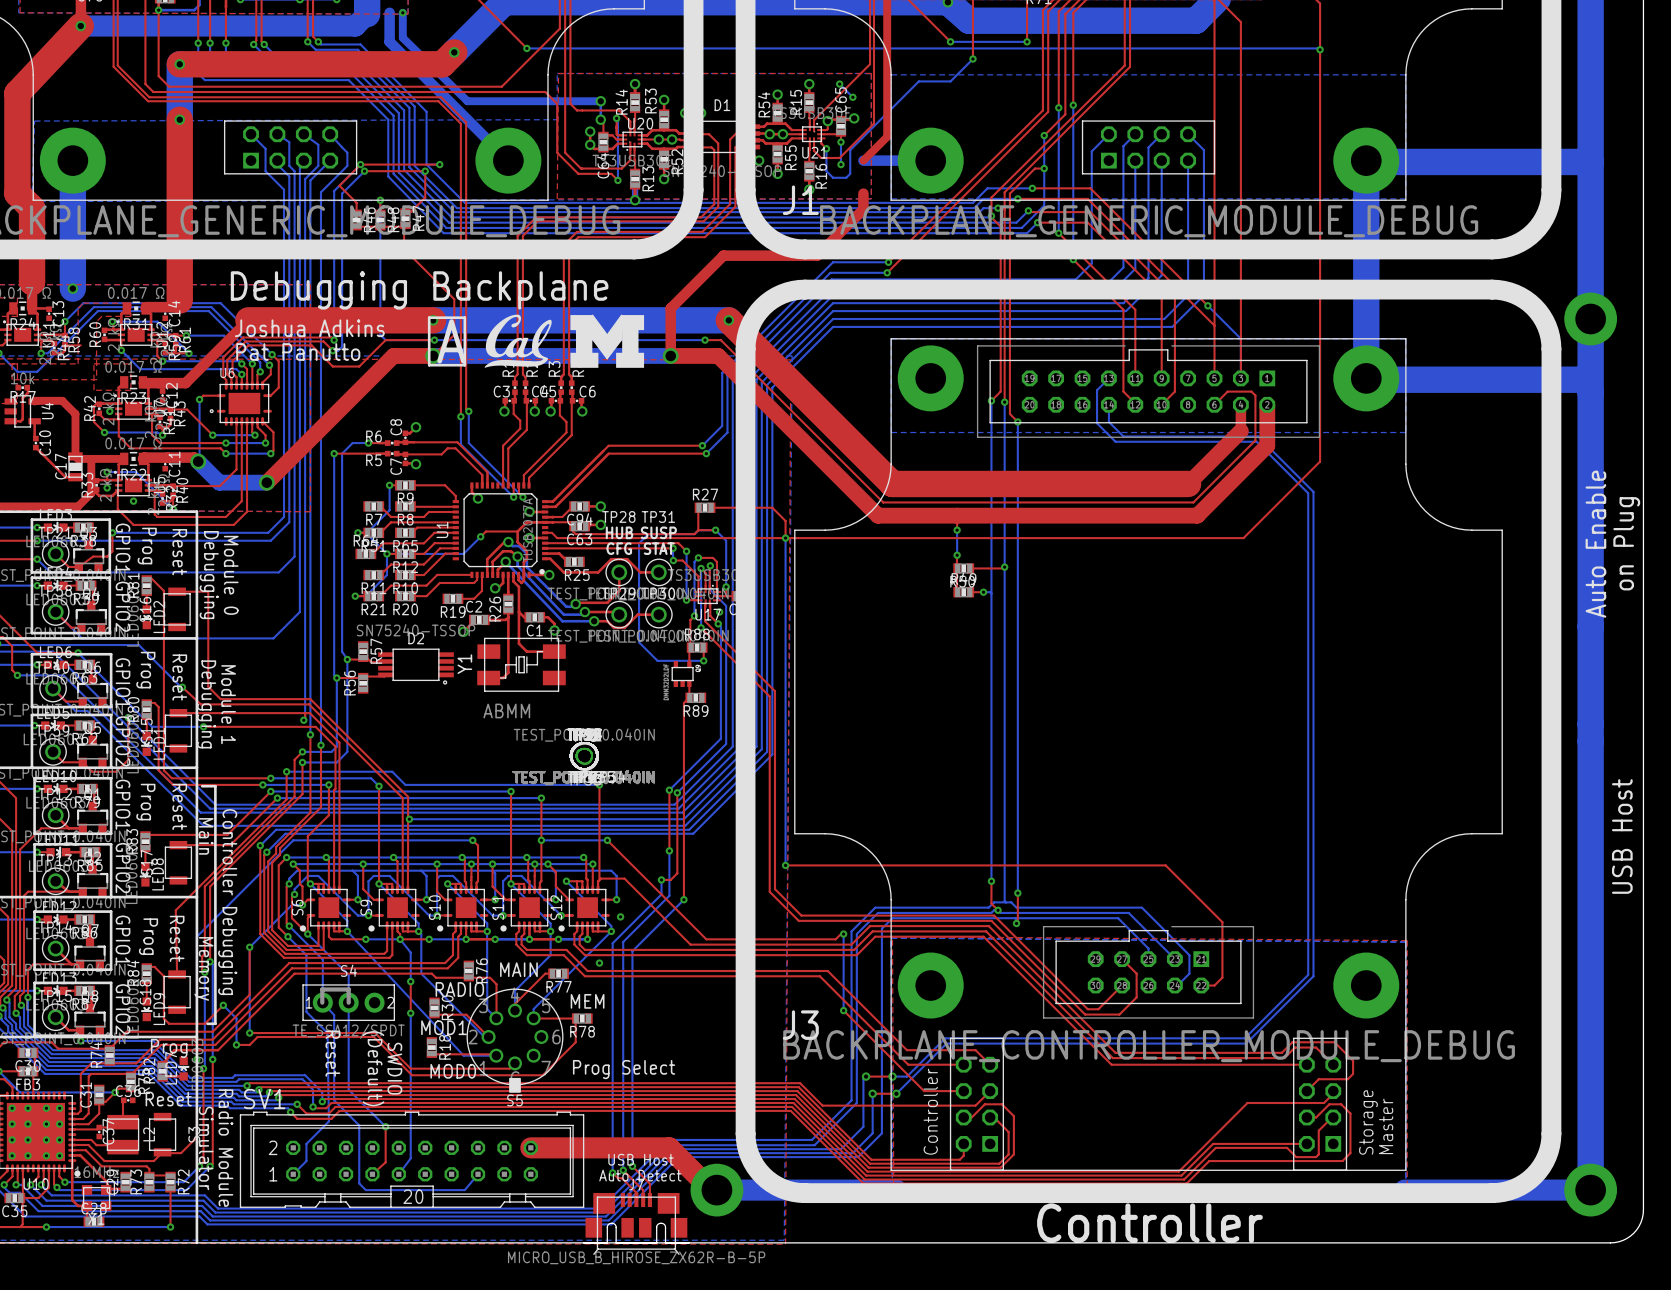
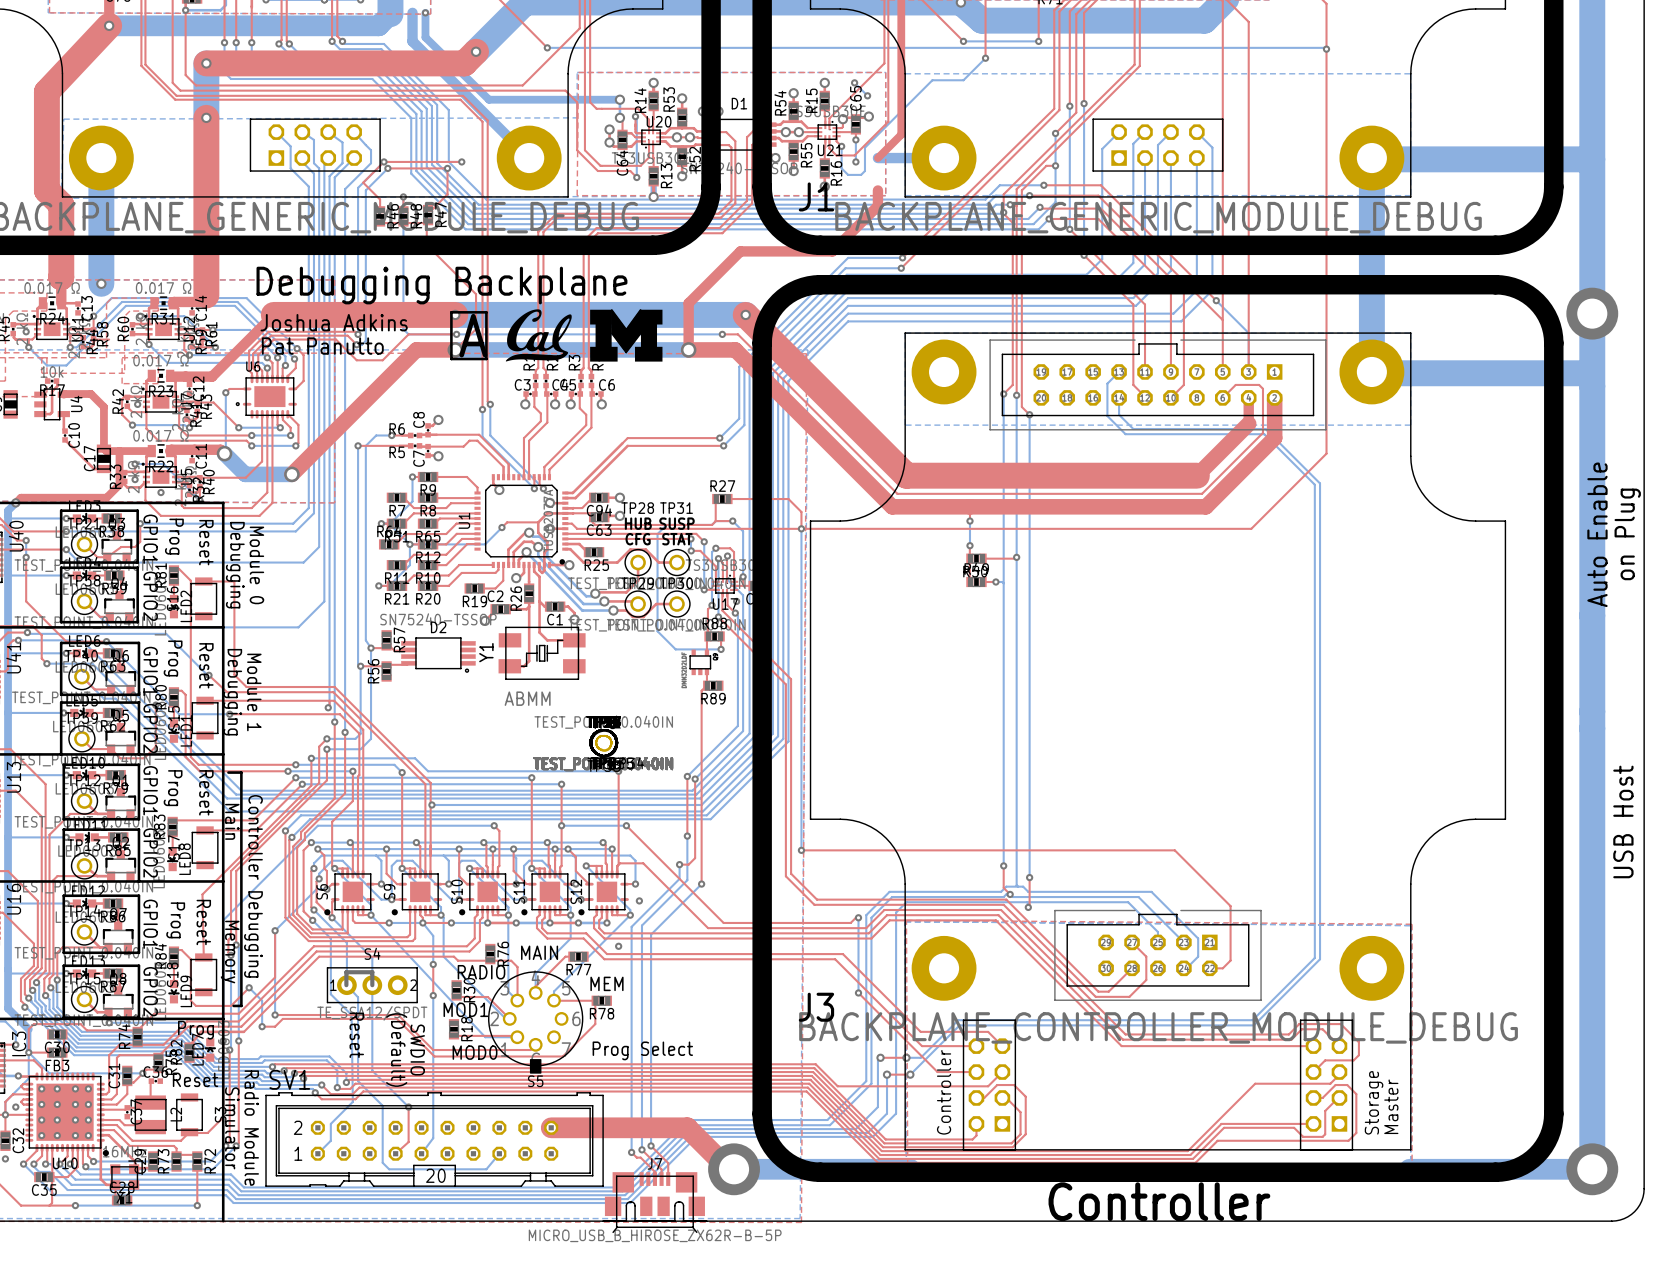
text: USB Host (641, 1159) -> none
text: Auto Detect (640, 1175) -> none

